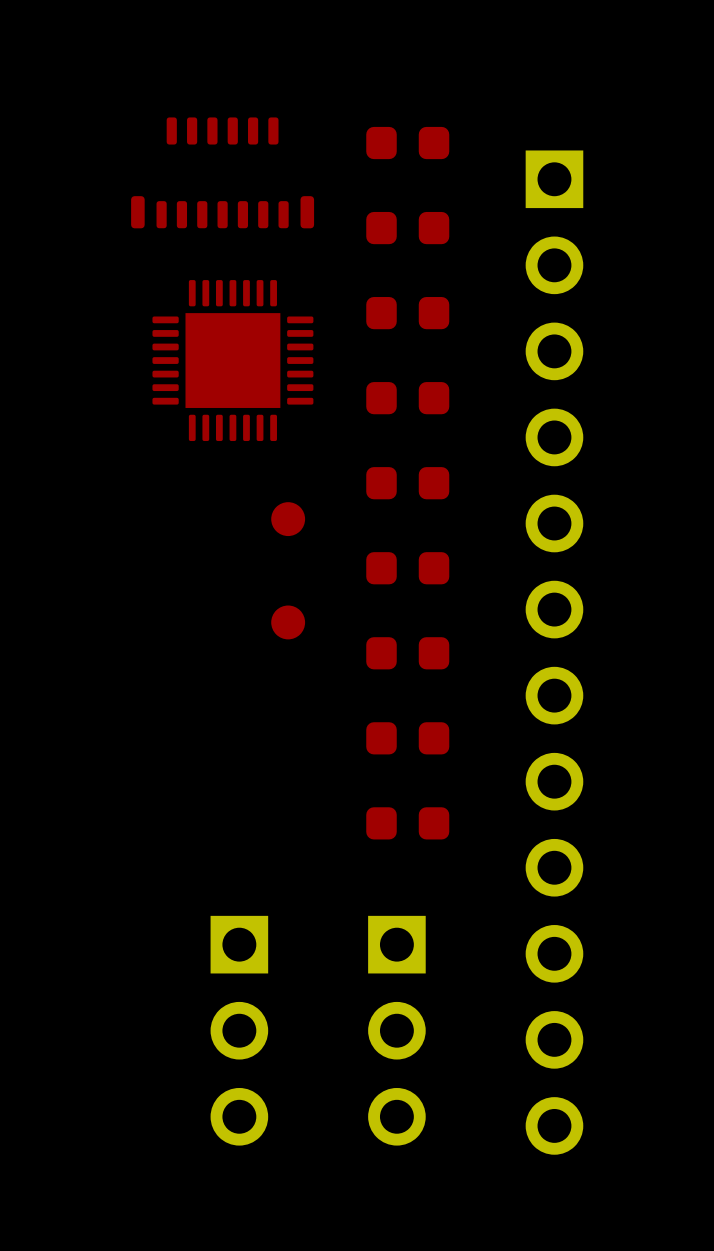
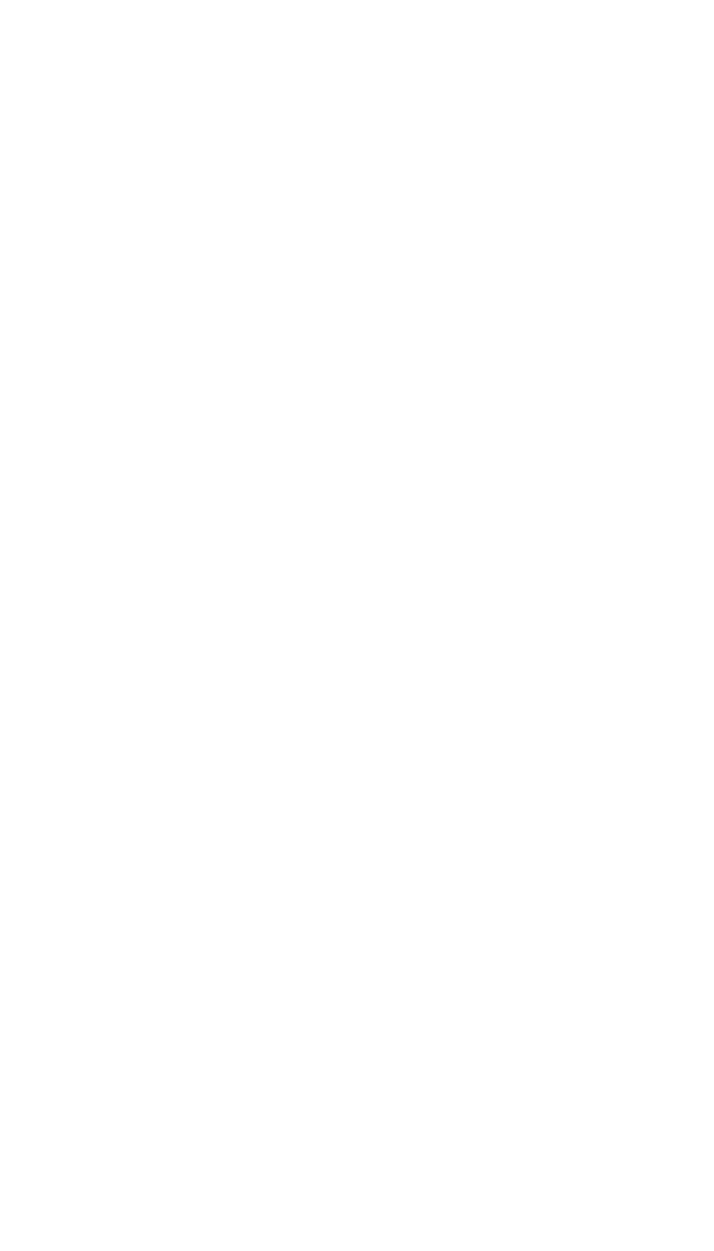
part: (407, 143) -> none
part: (222, 172) -> none
part: (407, 228) -> none
part: (407, 313) -> none
part: (232, 360) -> none
part: (407, 398) -> none
part: (407, 483) -> none
part: (288, 519) -> none
part: (407, 568) -> none
part: (288, 622) -> none
part: (554, 652) -> none
part: (407, 653) -> none
part: (407, 738) -> none
part: (407, 823) -> none
part: (239, 1030) -> none
part: (396, 1030) -> none

